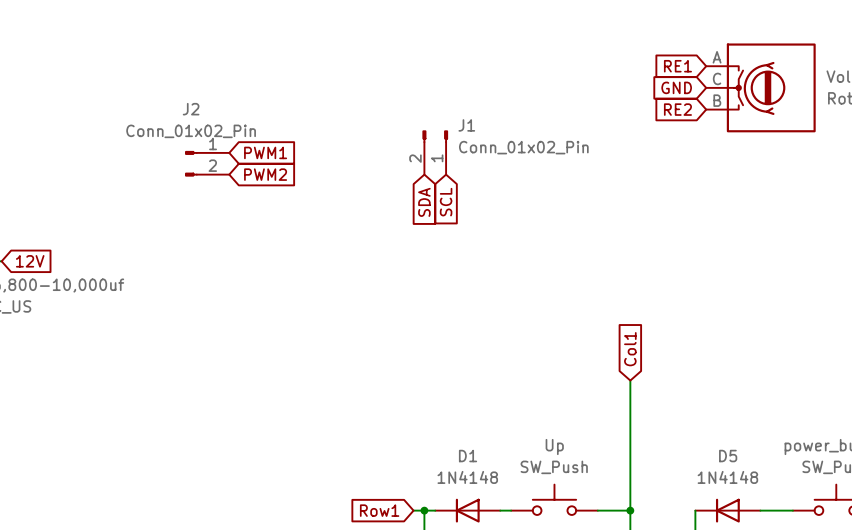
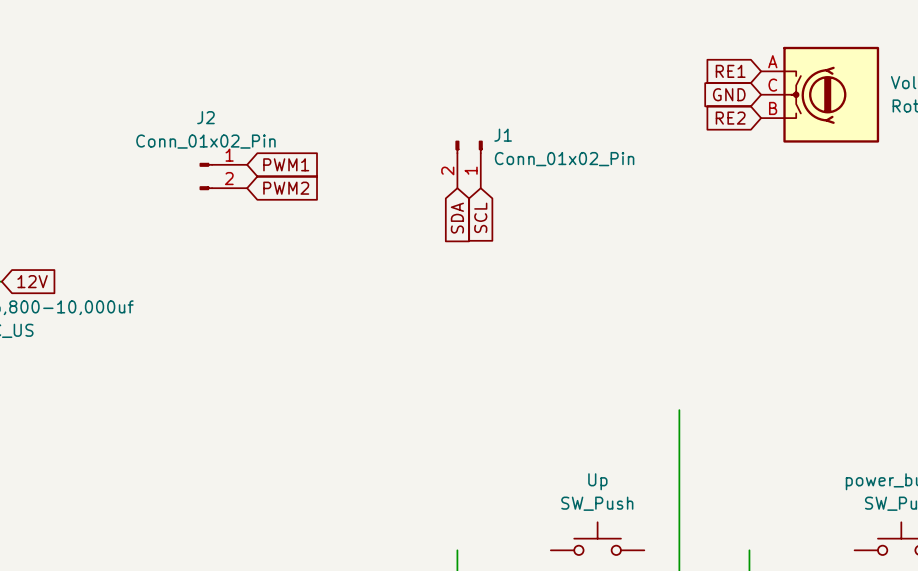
global label: Col1 (630, 349) -> none
global label: Row1 (379, 510) -> none
wire: (413, 510) (435, 510) -> none
junction: (424, 510) -> none
D1: 1N4148 (467, 510) -> none
wire: (500, 510) (511, 510) -> none
wire: (597, 510) (630, 510) -> none
junction: (630, 510) -> none
D5: 1N4148 (727, 510) -> none
wire: (760, 510) (792, 510) -> none

